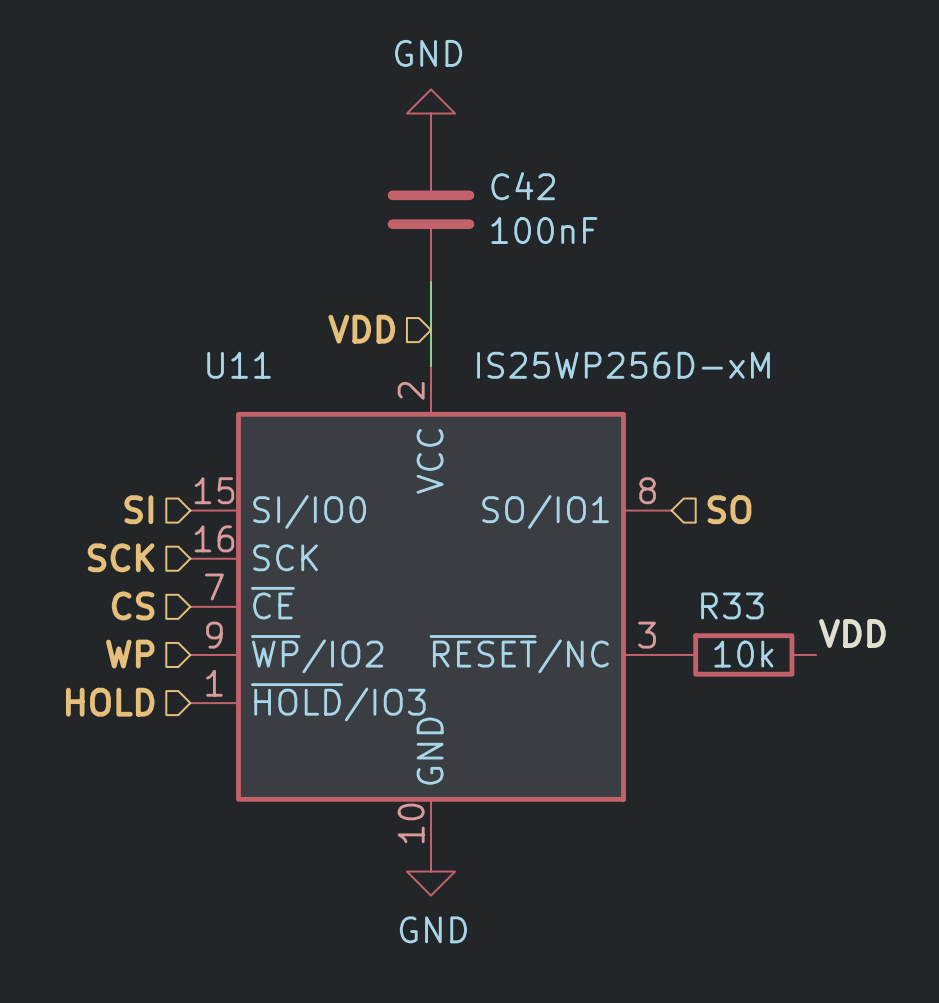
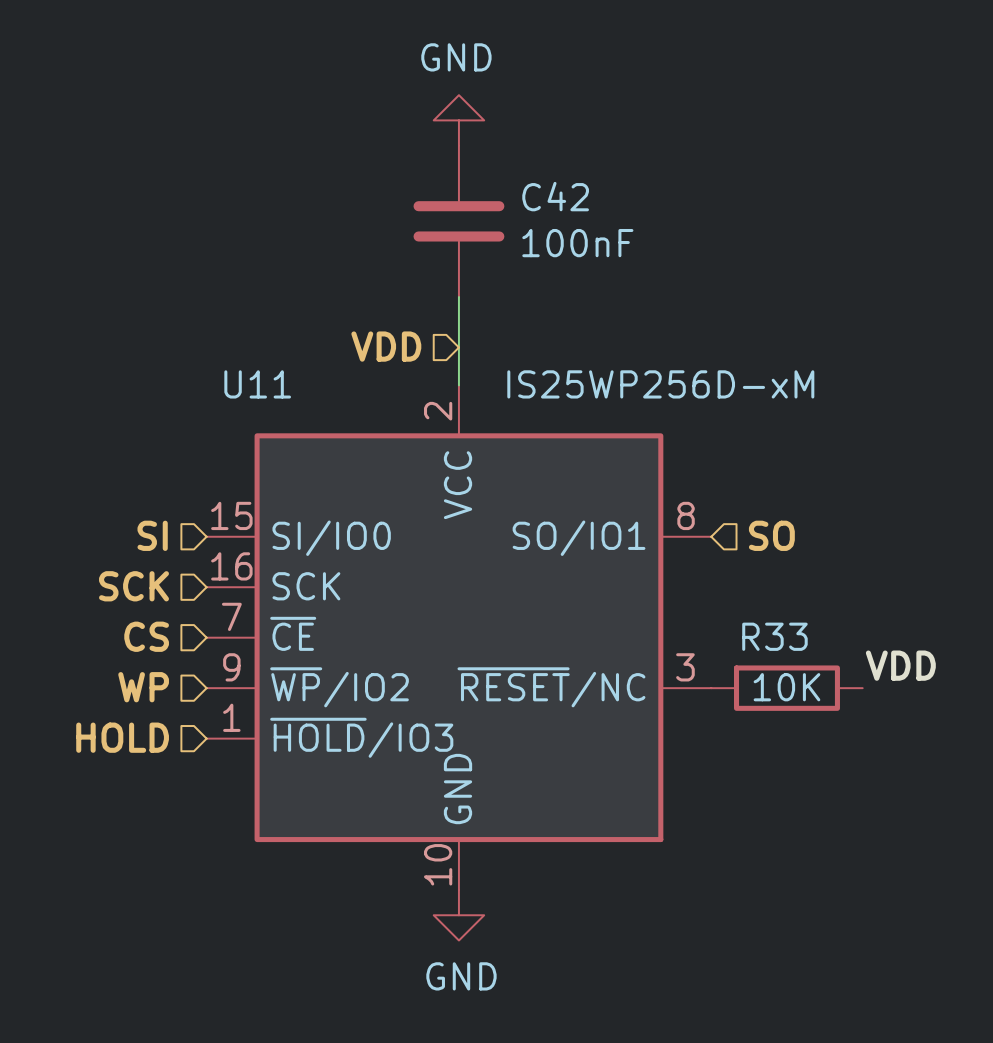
R33 value: 10k (743, 654) -> 10K (786, 687)

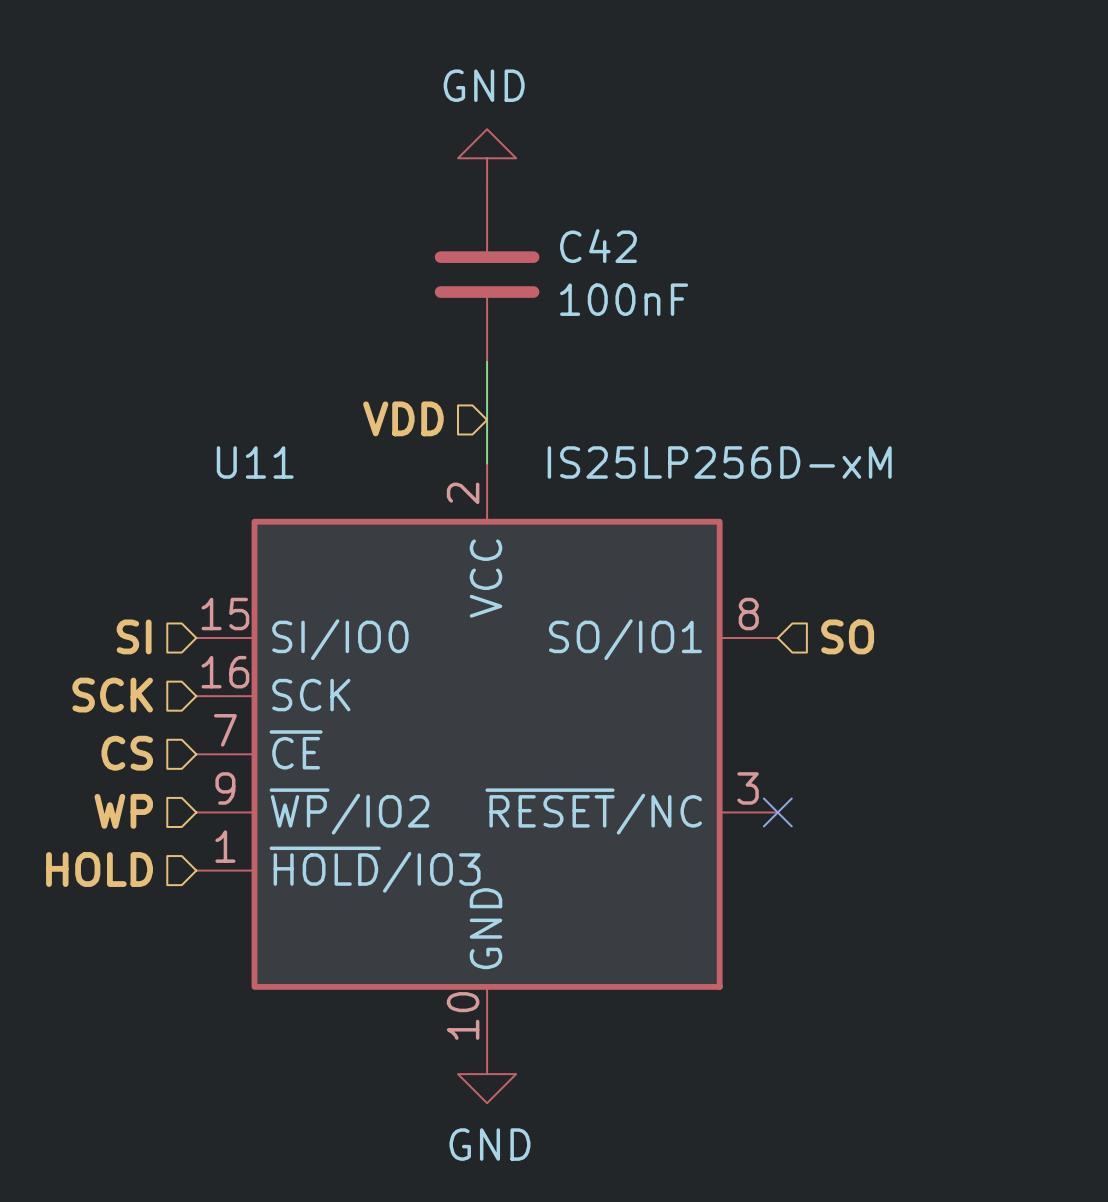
U11 value: IS25WP256D-xM (660, 384) -> IS25LP256D-xM (719, 462)
label: VDD (900, 665) -> none
no-connect mark: none -> (777, 812)
R33: 10K (786, 688) -> none

